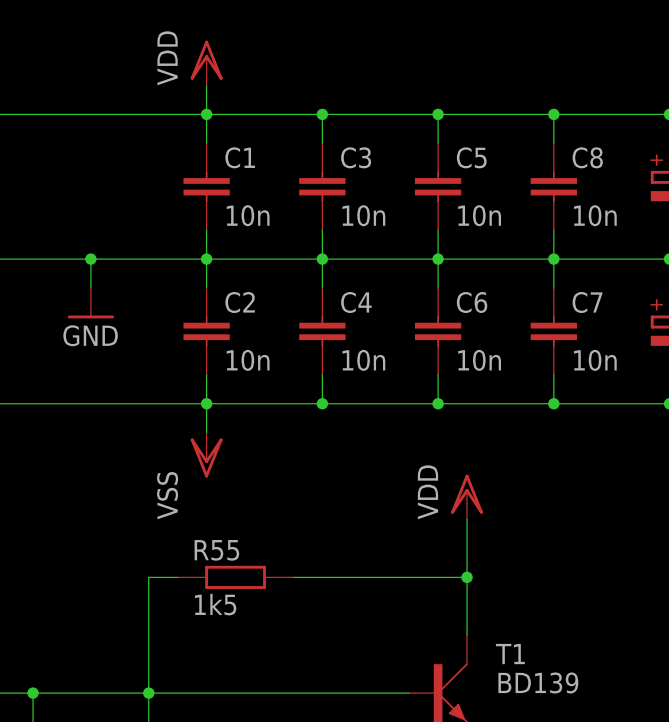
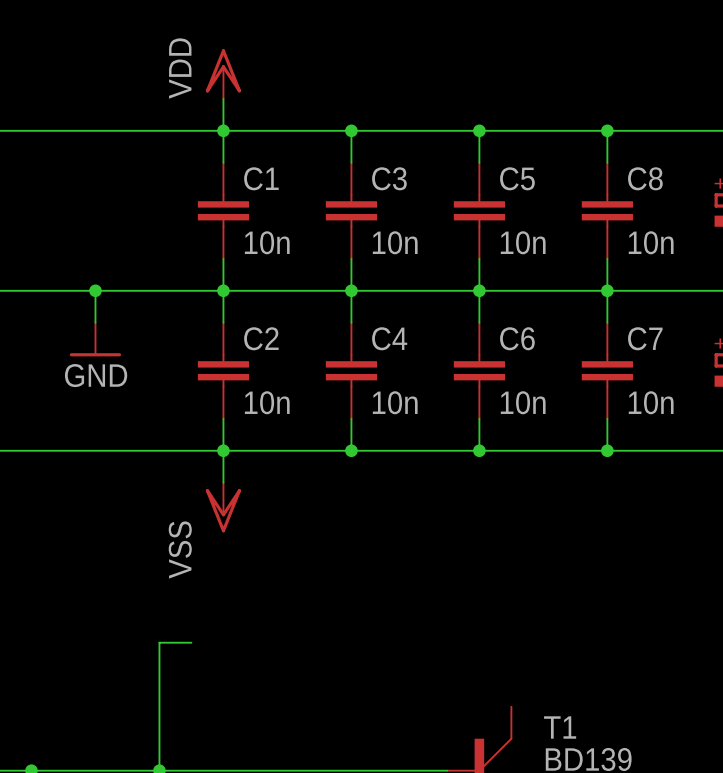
power symbol: VDD (467, 497) -> none
wire: (467, 519) (467, 635) -> none
R55: 1k5 (235, 577) -> none
wire: (293, 577) (467, 577) -> none
junction: (467, 577) -> none

